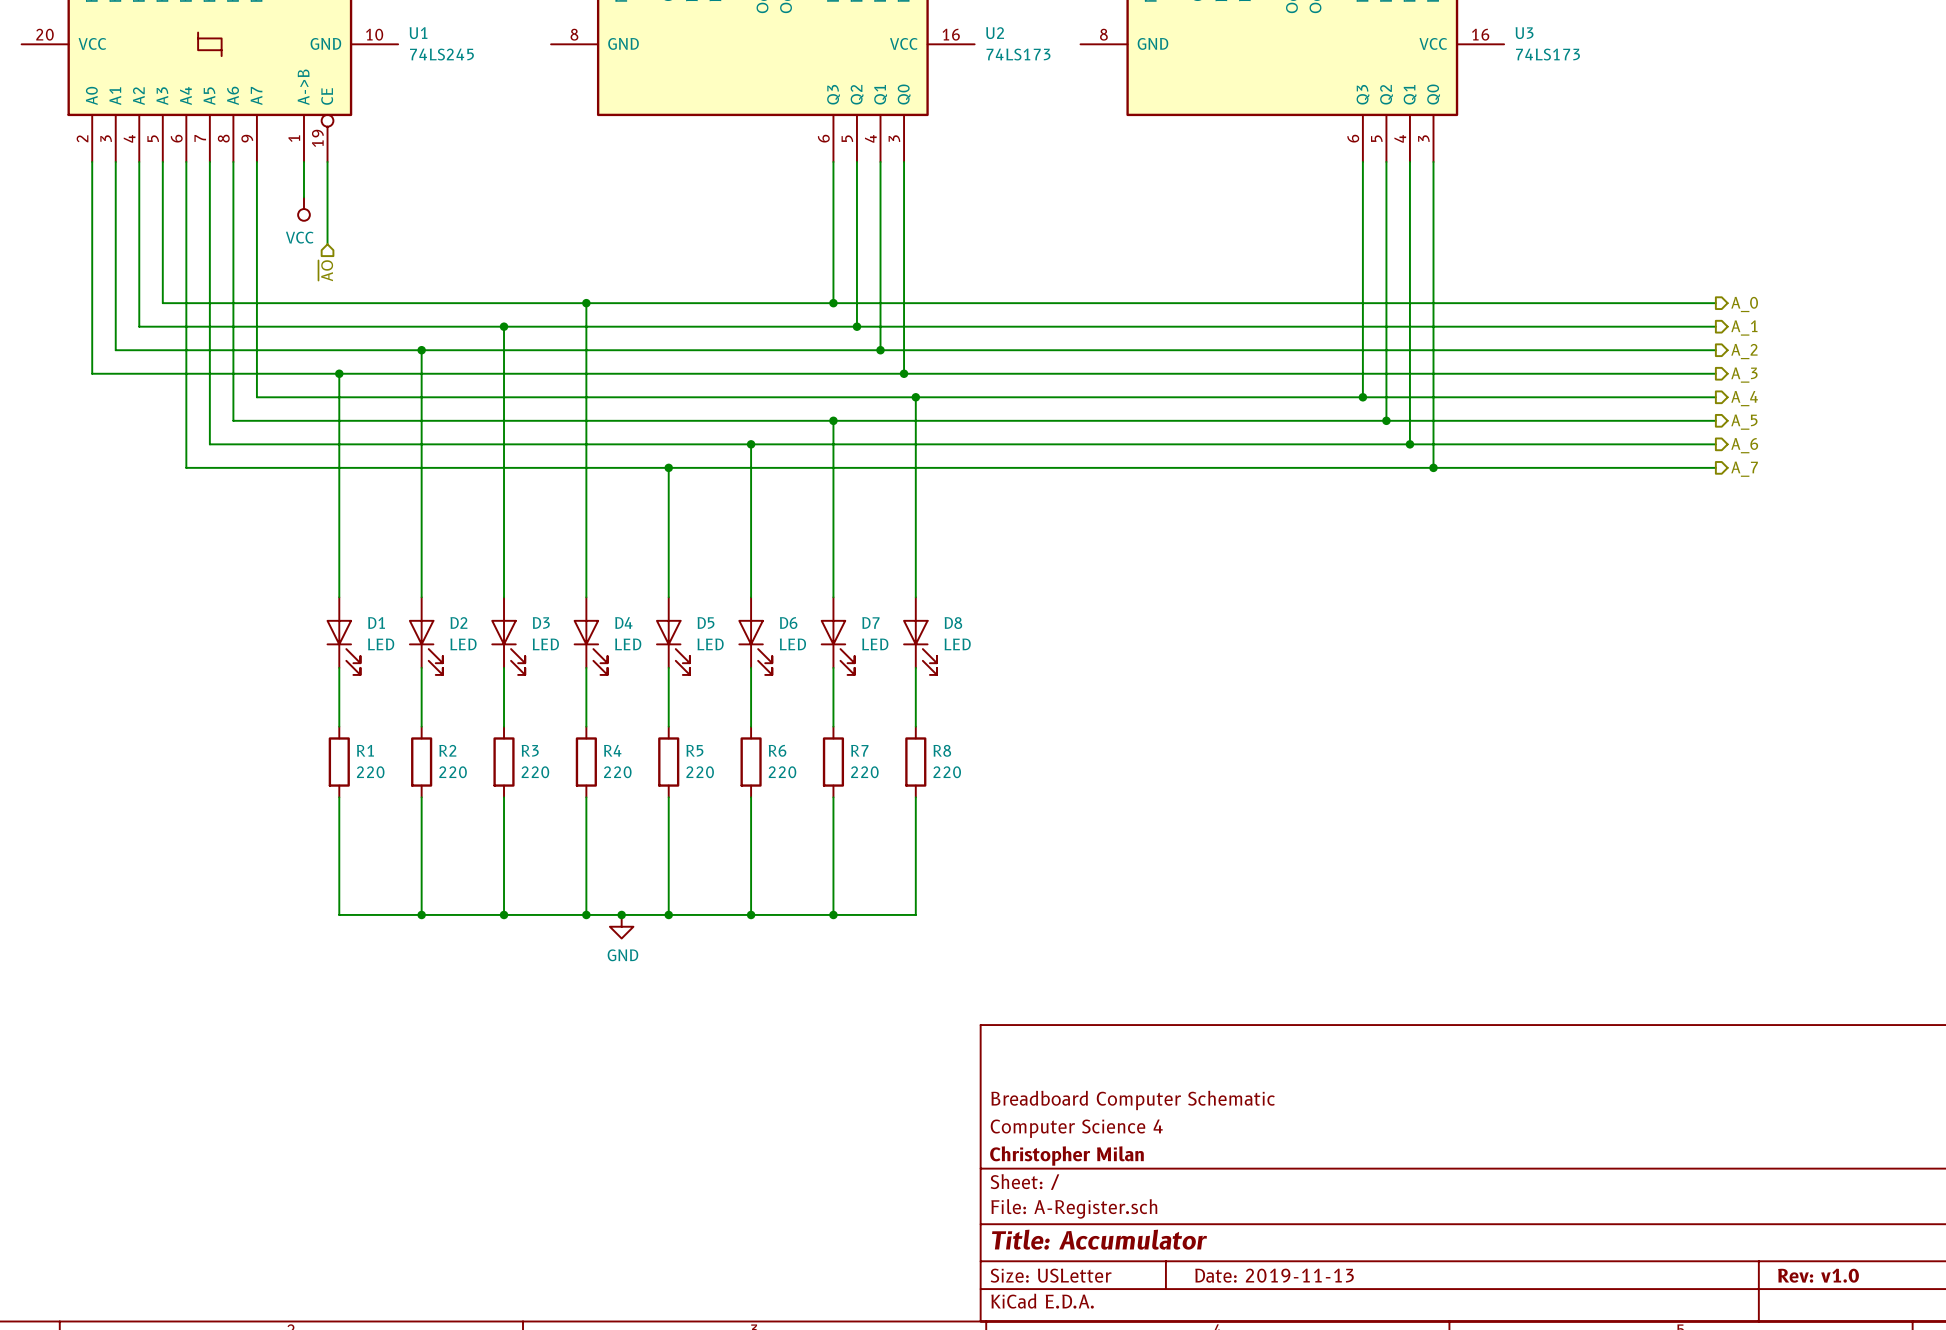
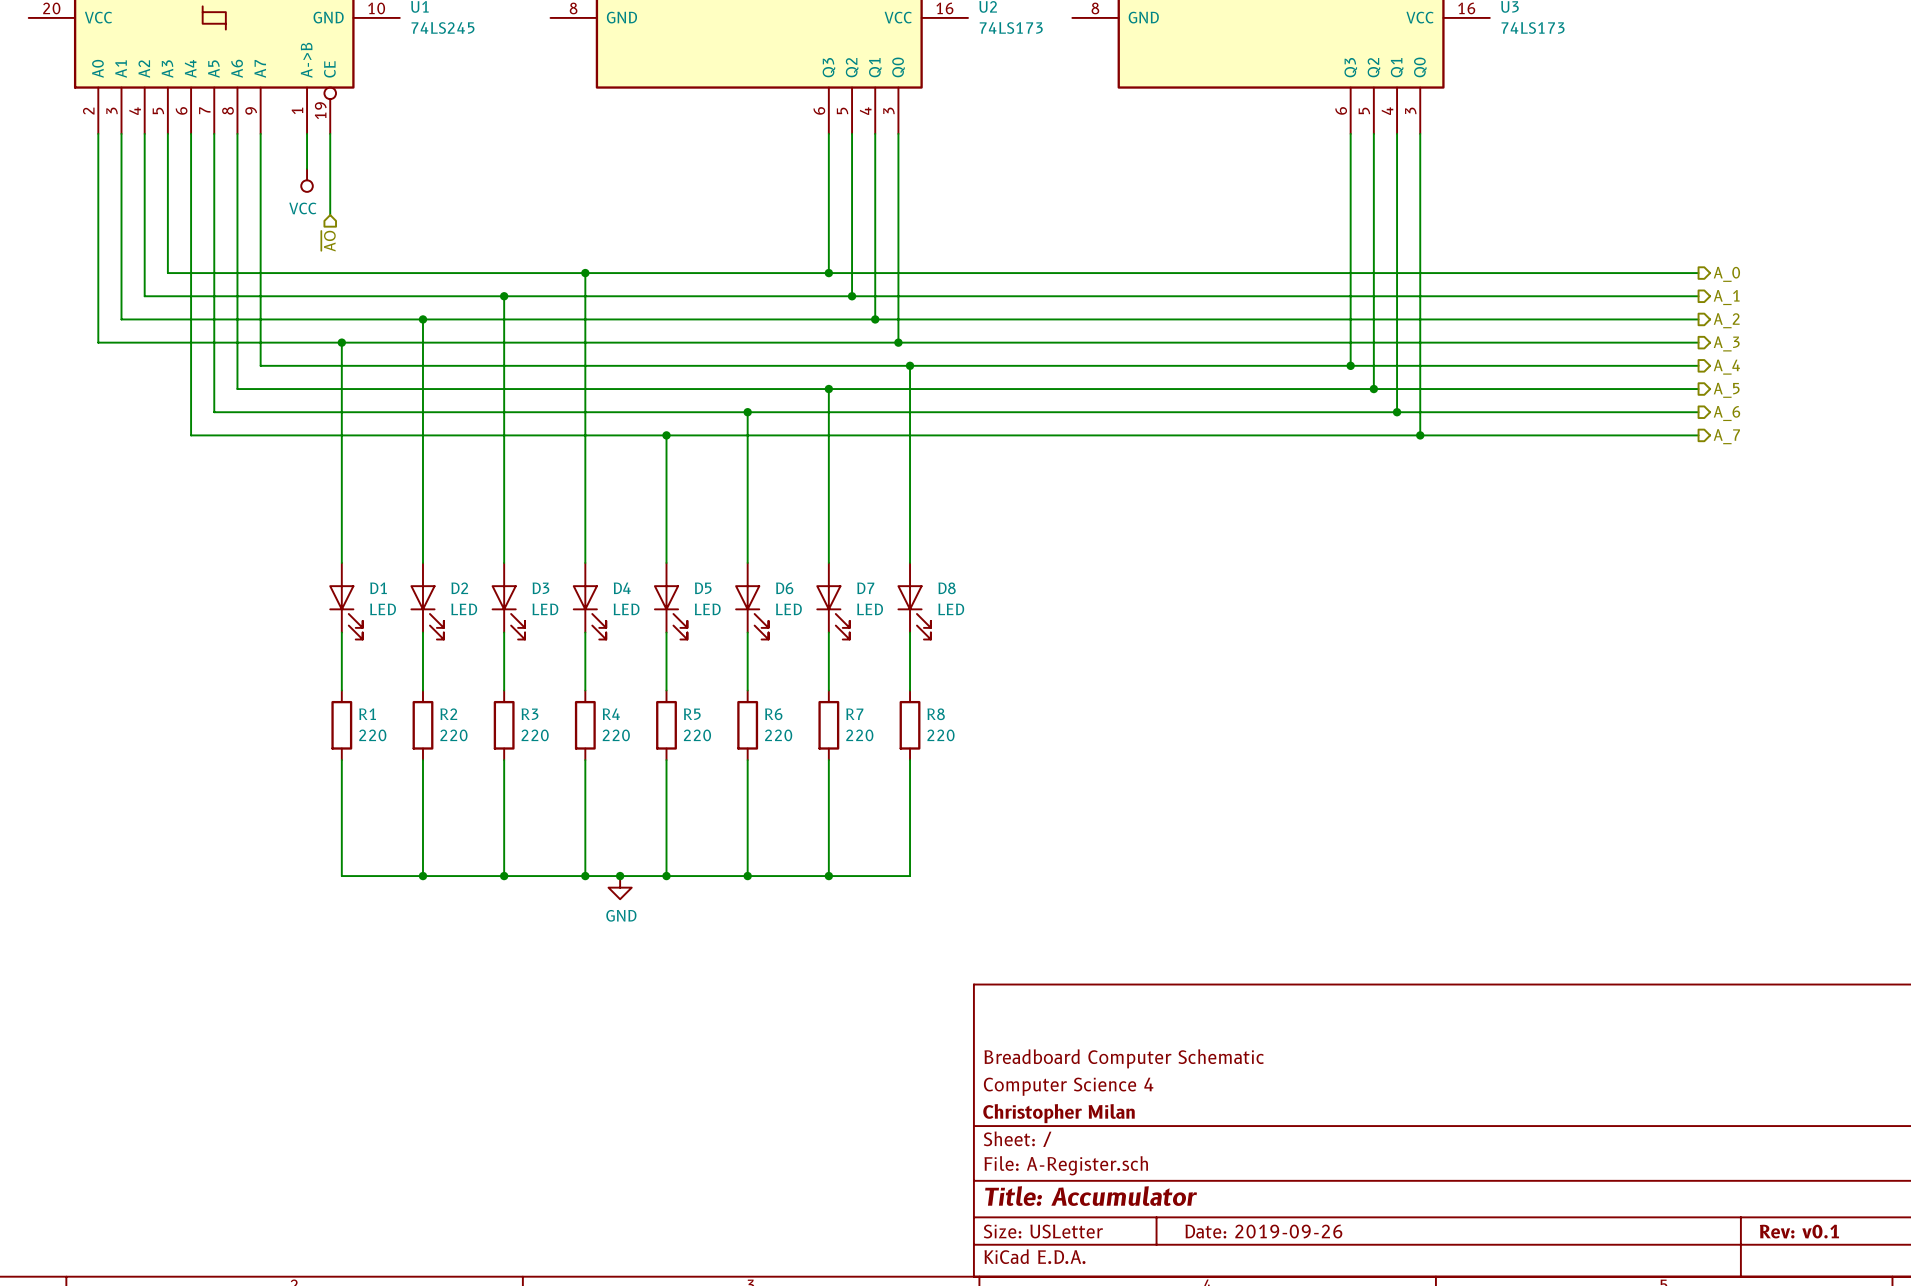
title block: Date: 2019-11-13 (1274, 1275) -> Date: 2019-09-26 (1263, 1231)
title block: Rev: v1.0 (1818, 1275) -> Rev: v0.1 (1799, 1231)

